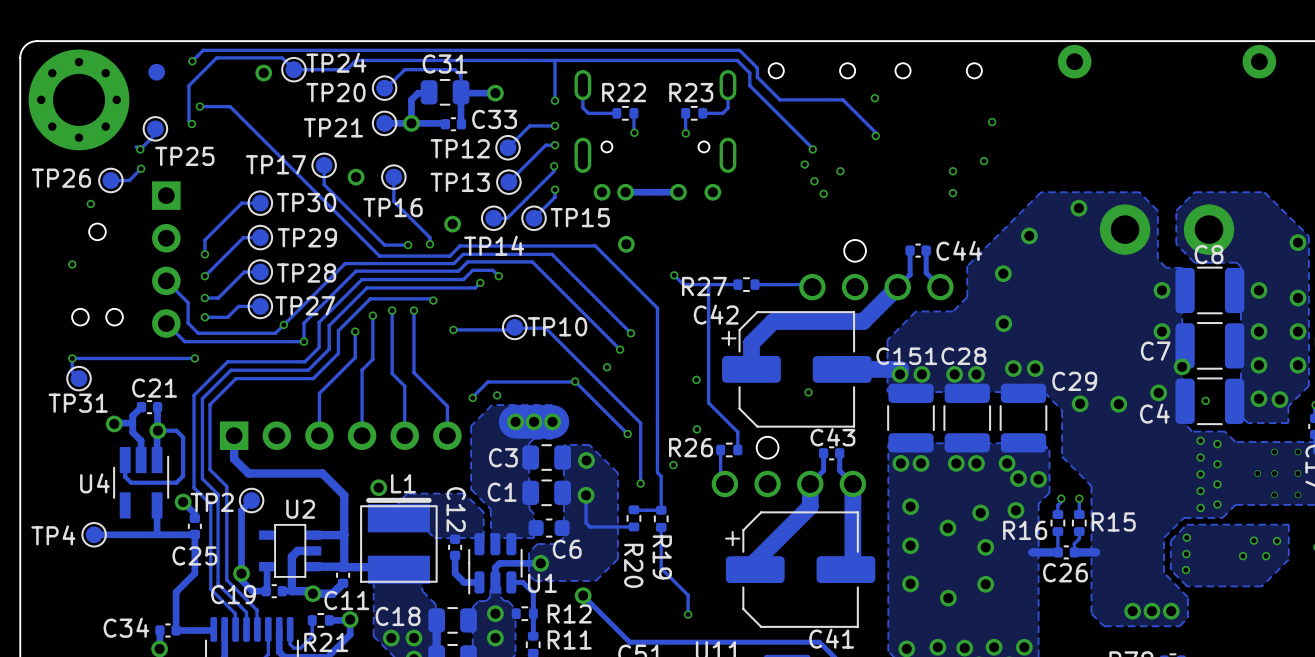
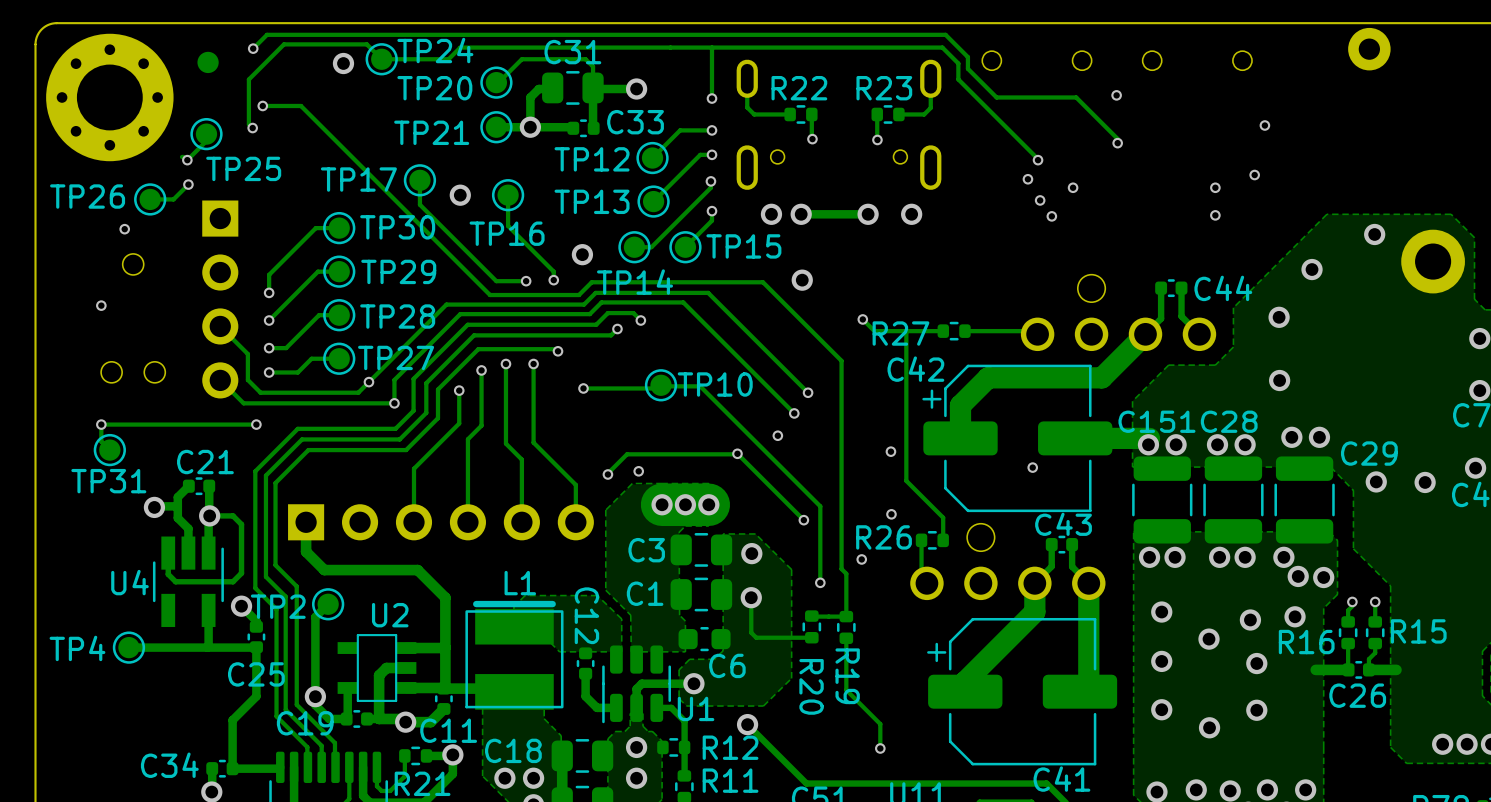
via: (378, 487) -> none

